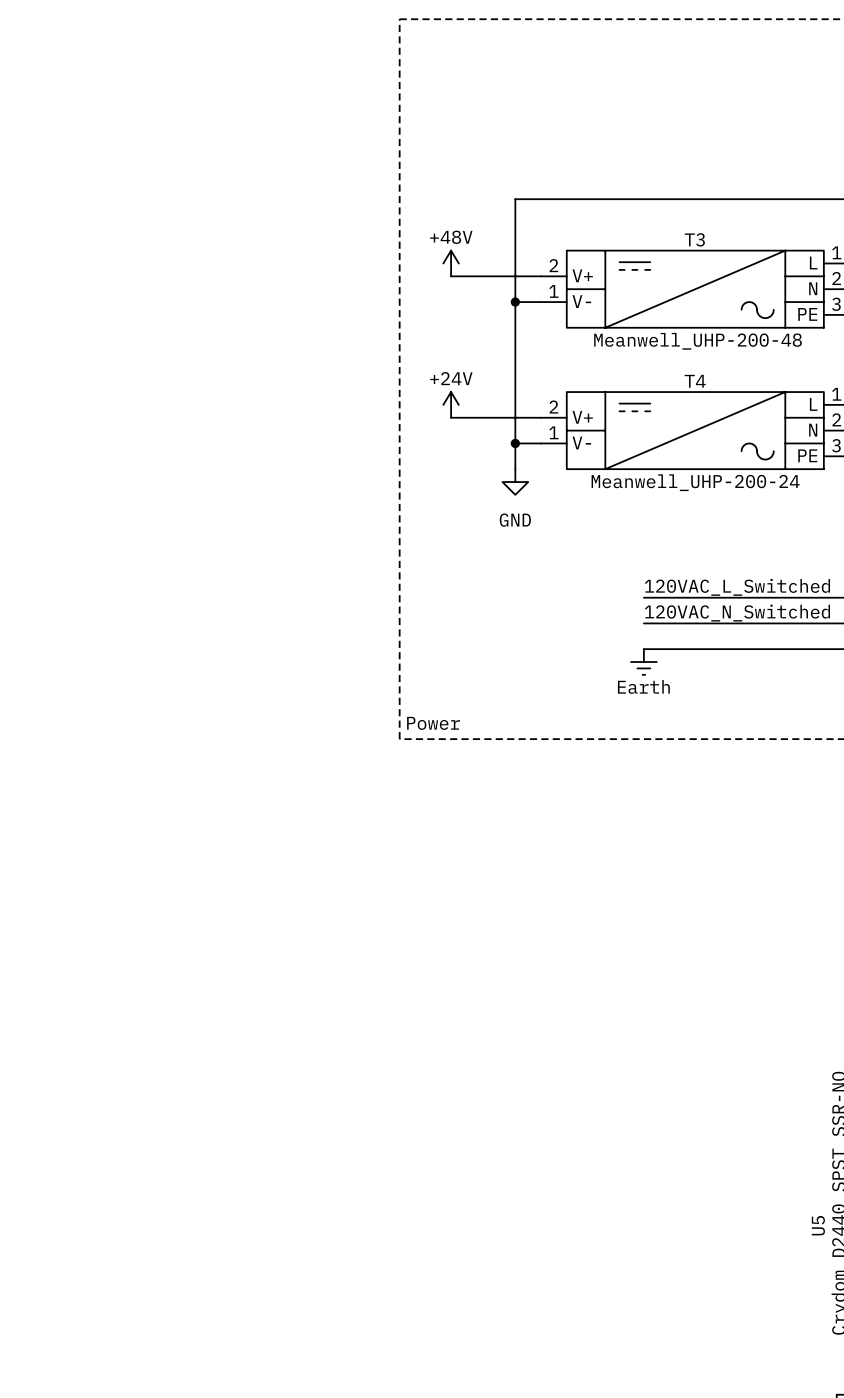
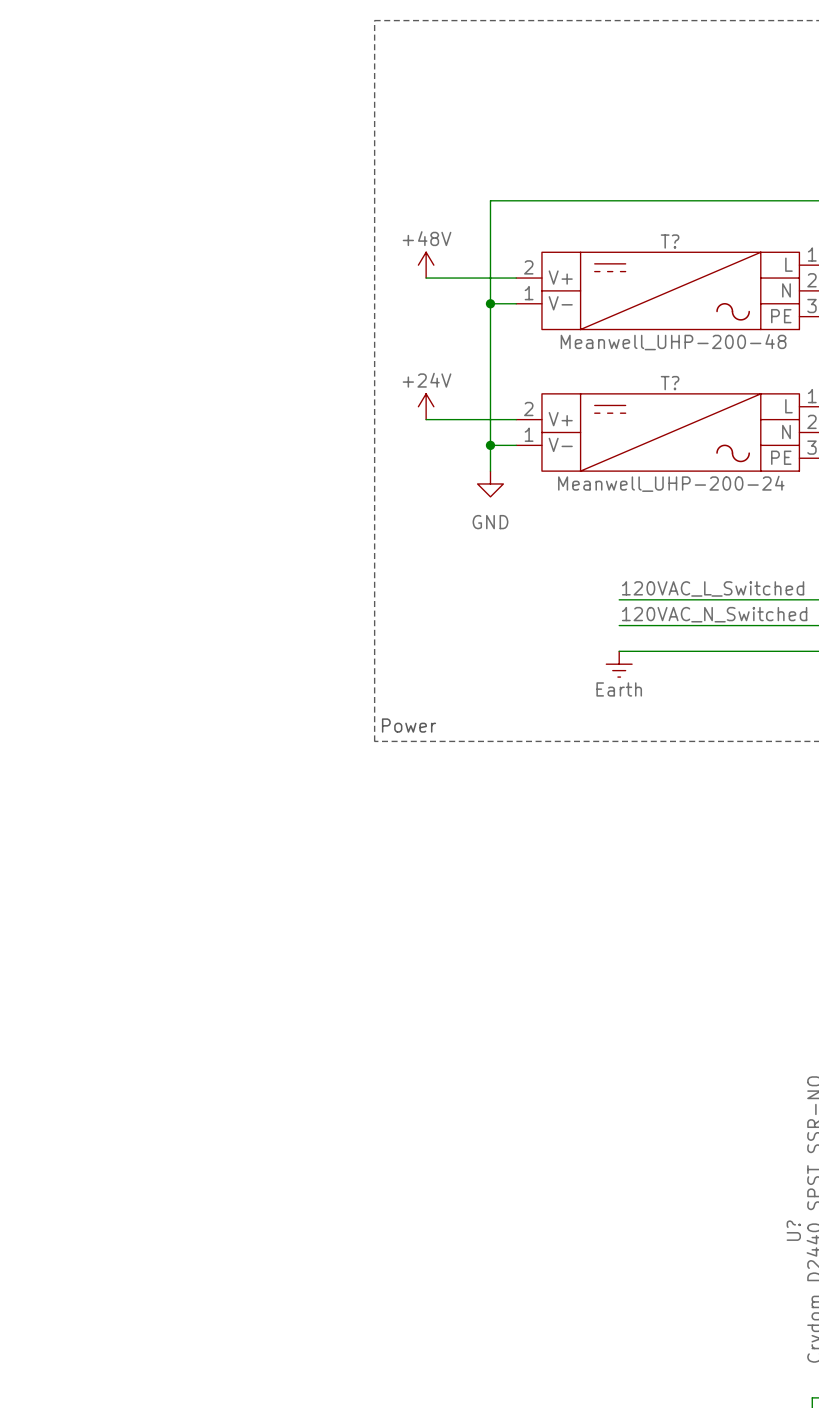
T3 name: T3 (694, 239) -> T? (670, 241)
T4 name: T4 (695, 381) -> T? (670, 383)
U5 name: U5 (818, 1225) -> U? (793, 1230)

